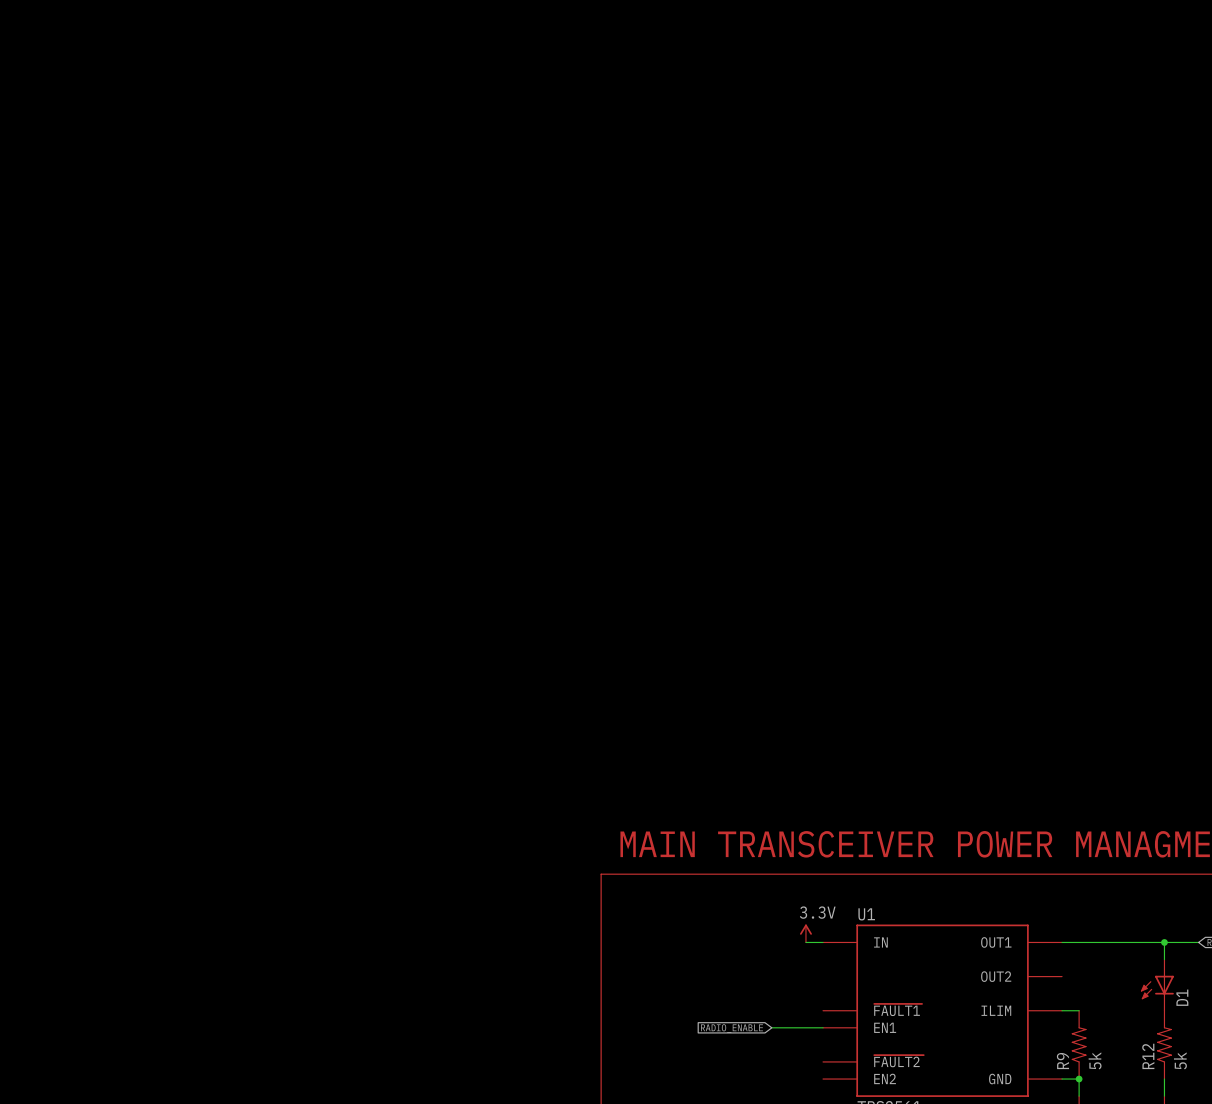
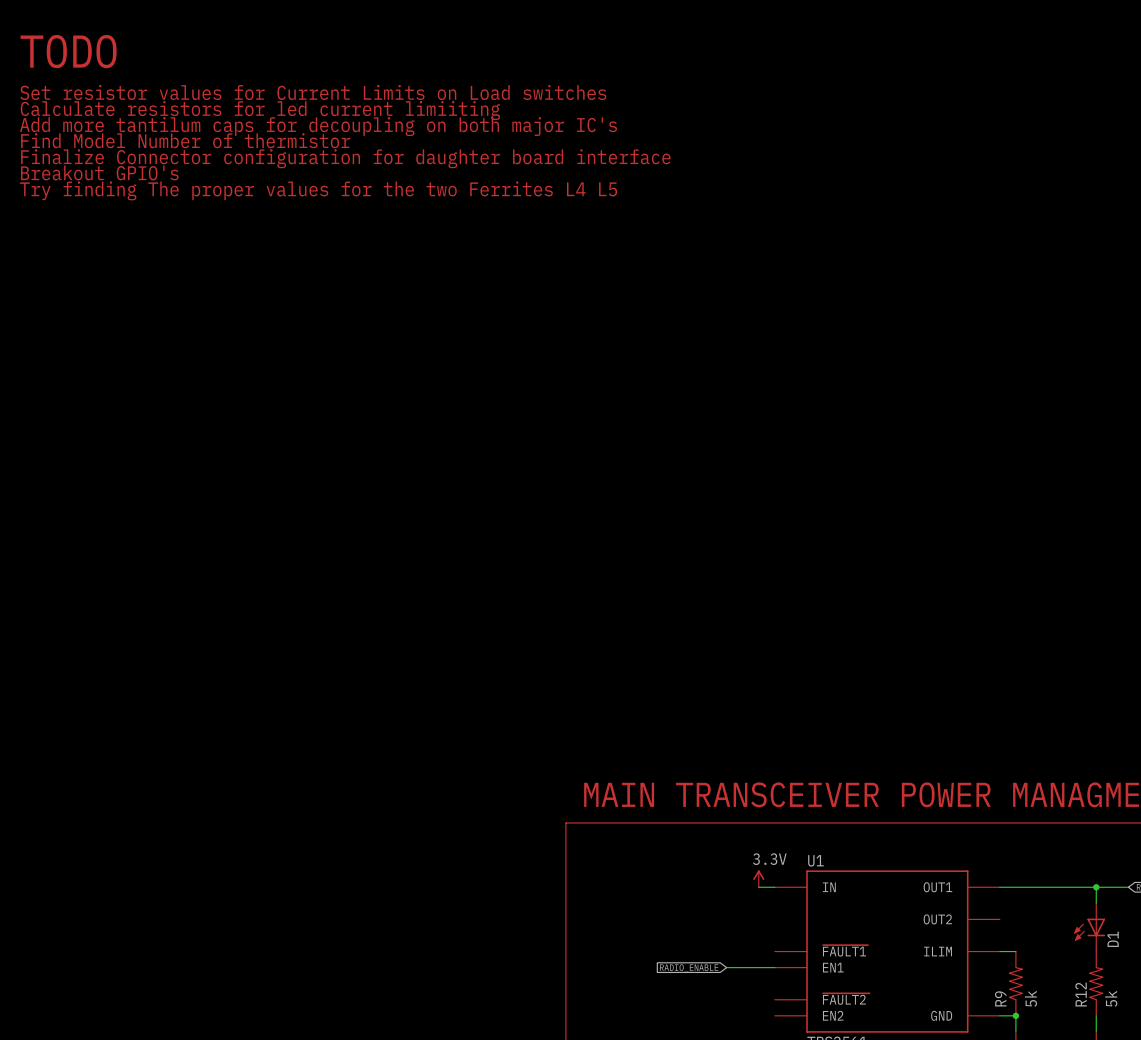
text: none -> TODO (68, 51)
text: none -> Set resistor values for Current Limits on Load switches (313, 92)
text: none -> Calculate resistors for led current limiiting (260, 110)
text: none -> Add more tantilum caps for decoupling on both major IC's (318, 126)
text: none -> Find Model Number of thermistor (185, 140)
text: none -> Finalize Connector configuration for daughter board interface (345, 158)
text: none -> Breakout GPIO's (99, 172)
text: none -> Try finding The proper values for the two Ferrites L4 L5 (318, 190)

